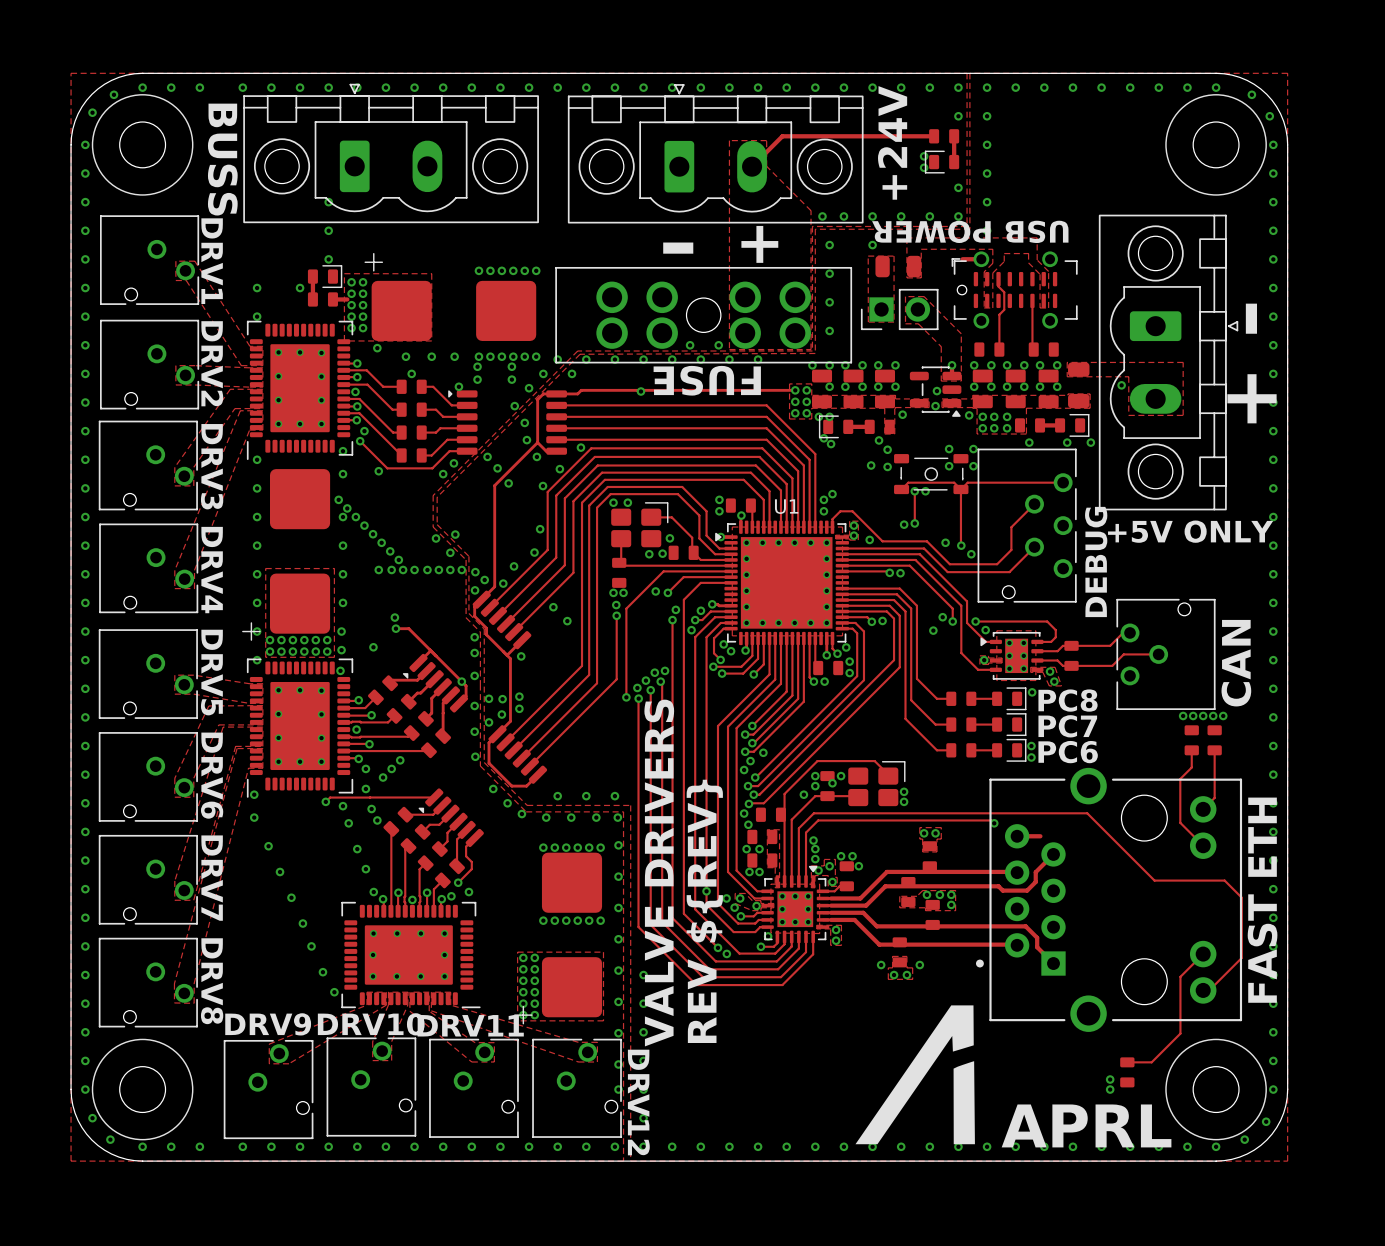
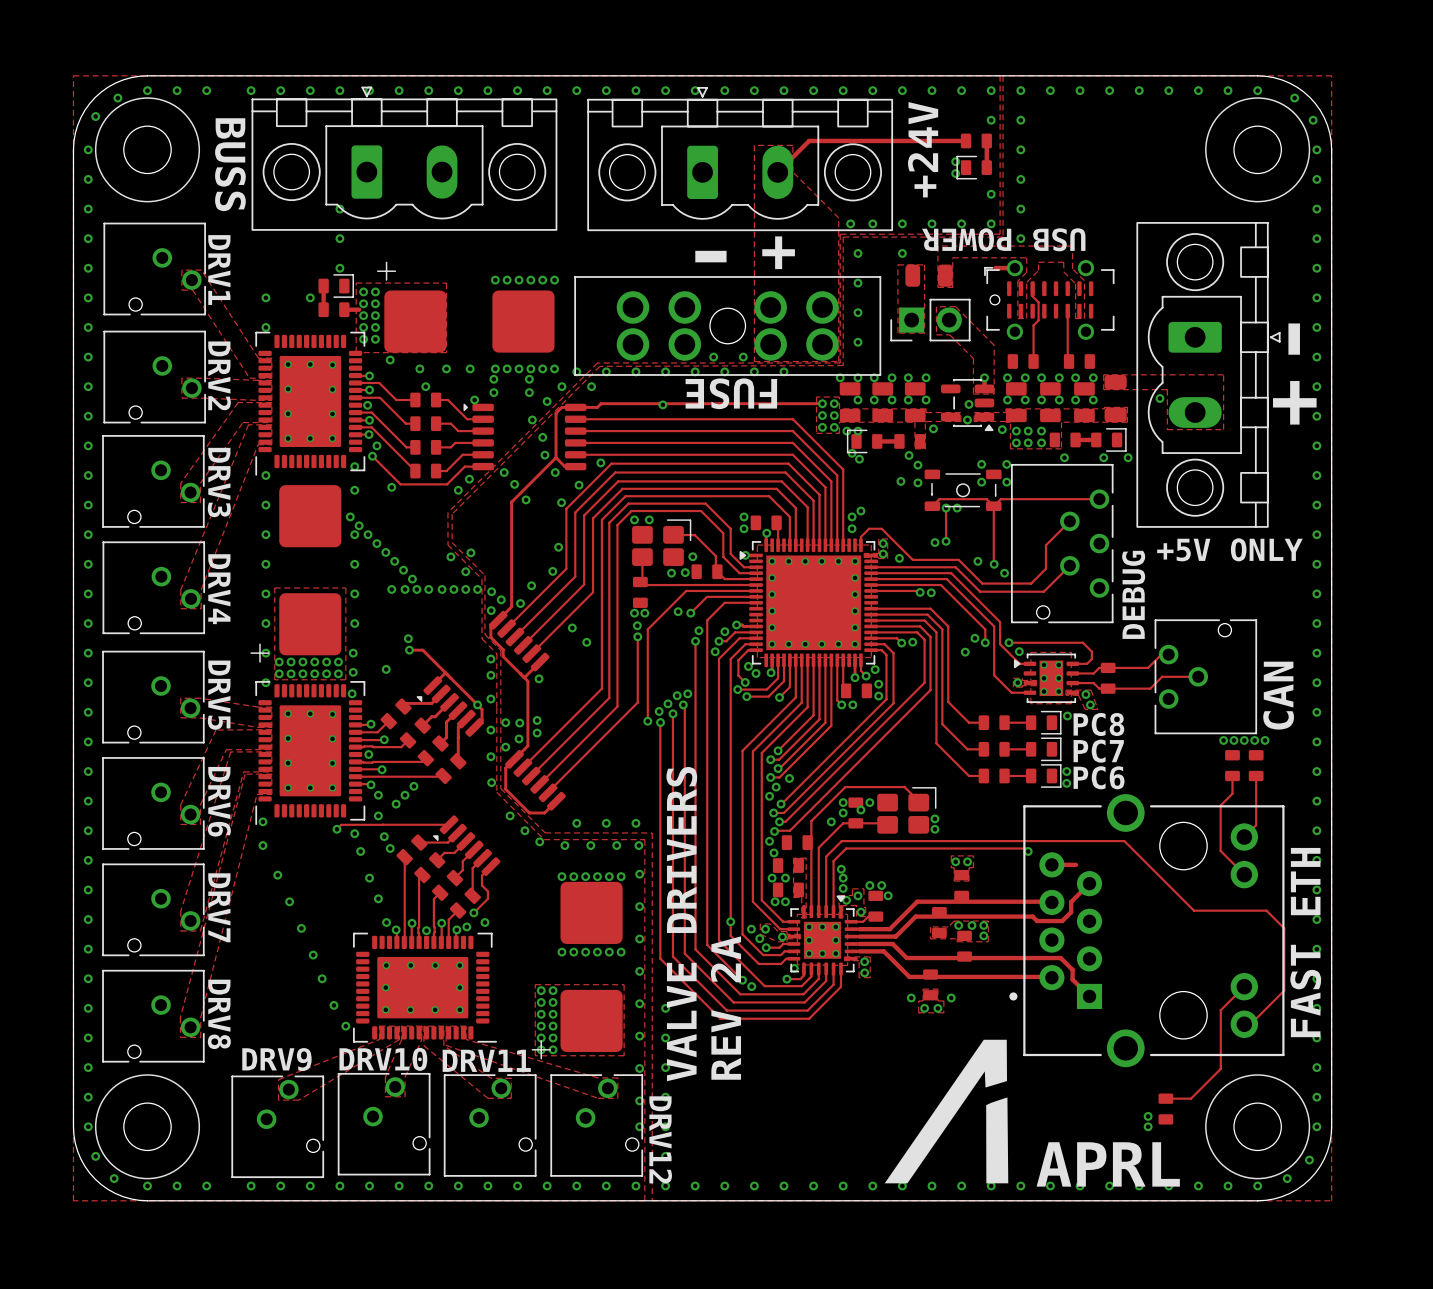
U1 name: U1 (786, 506) -> none
text: REV ${REV} (704, 911) -> REV 2A (725, 1008)

